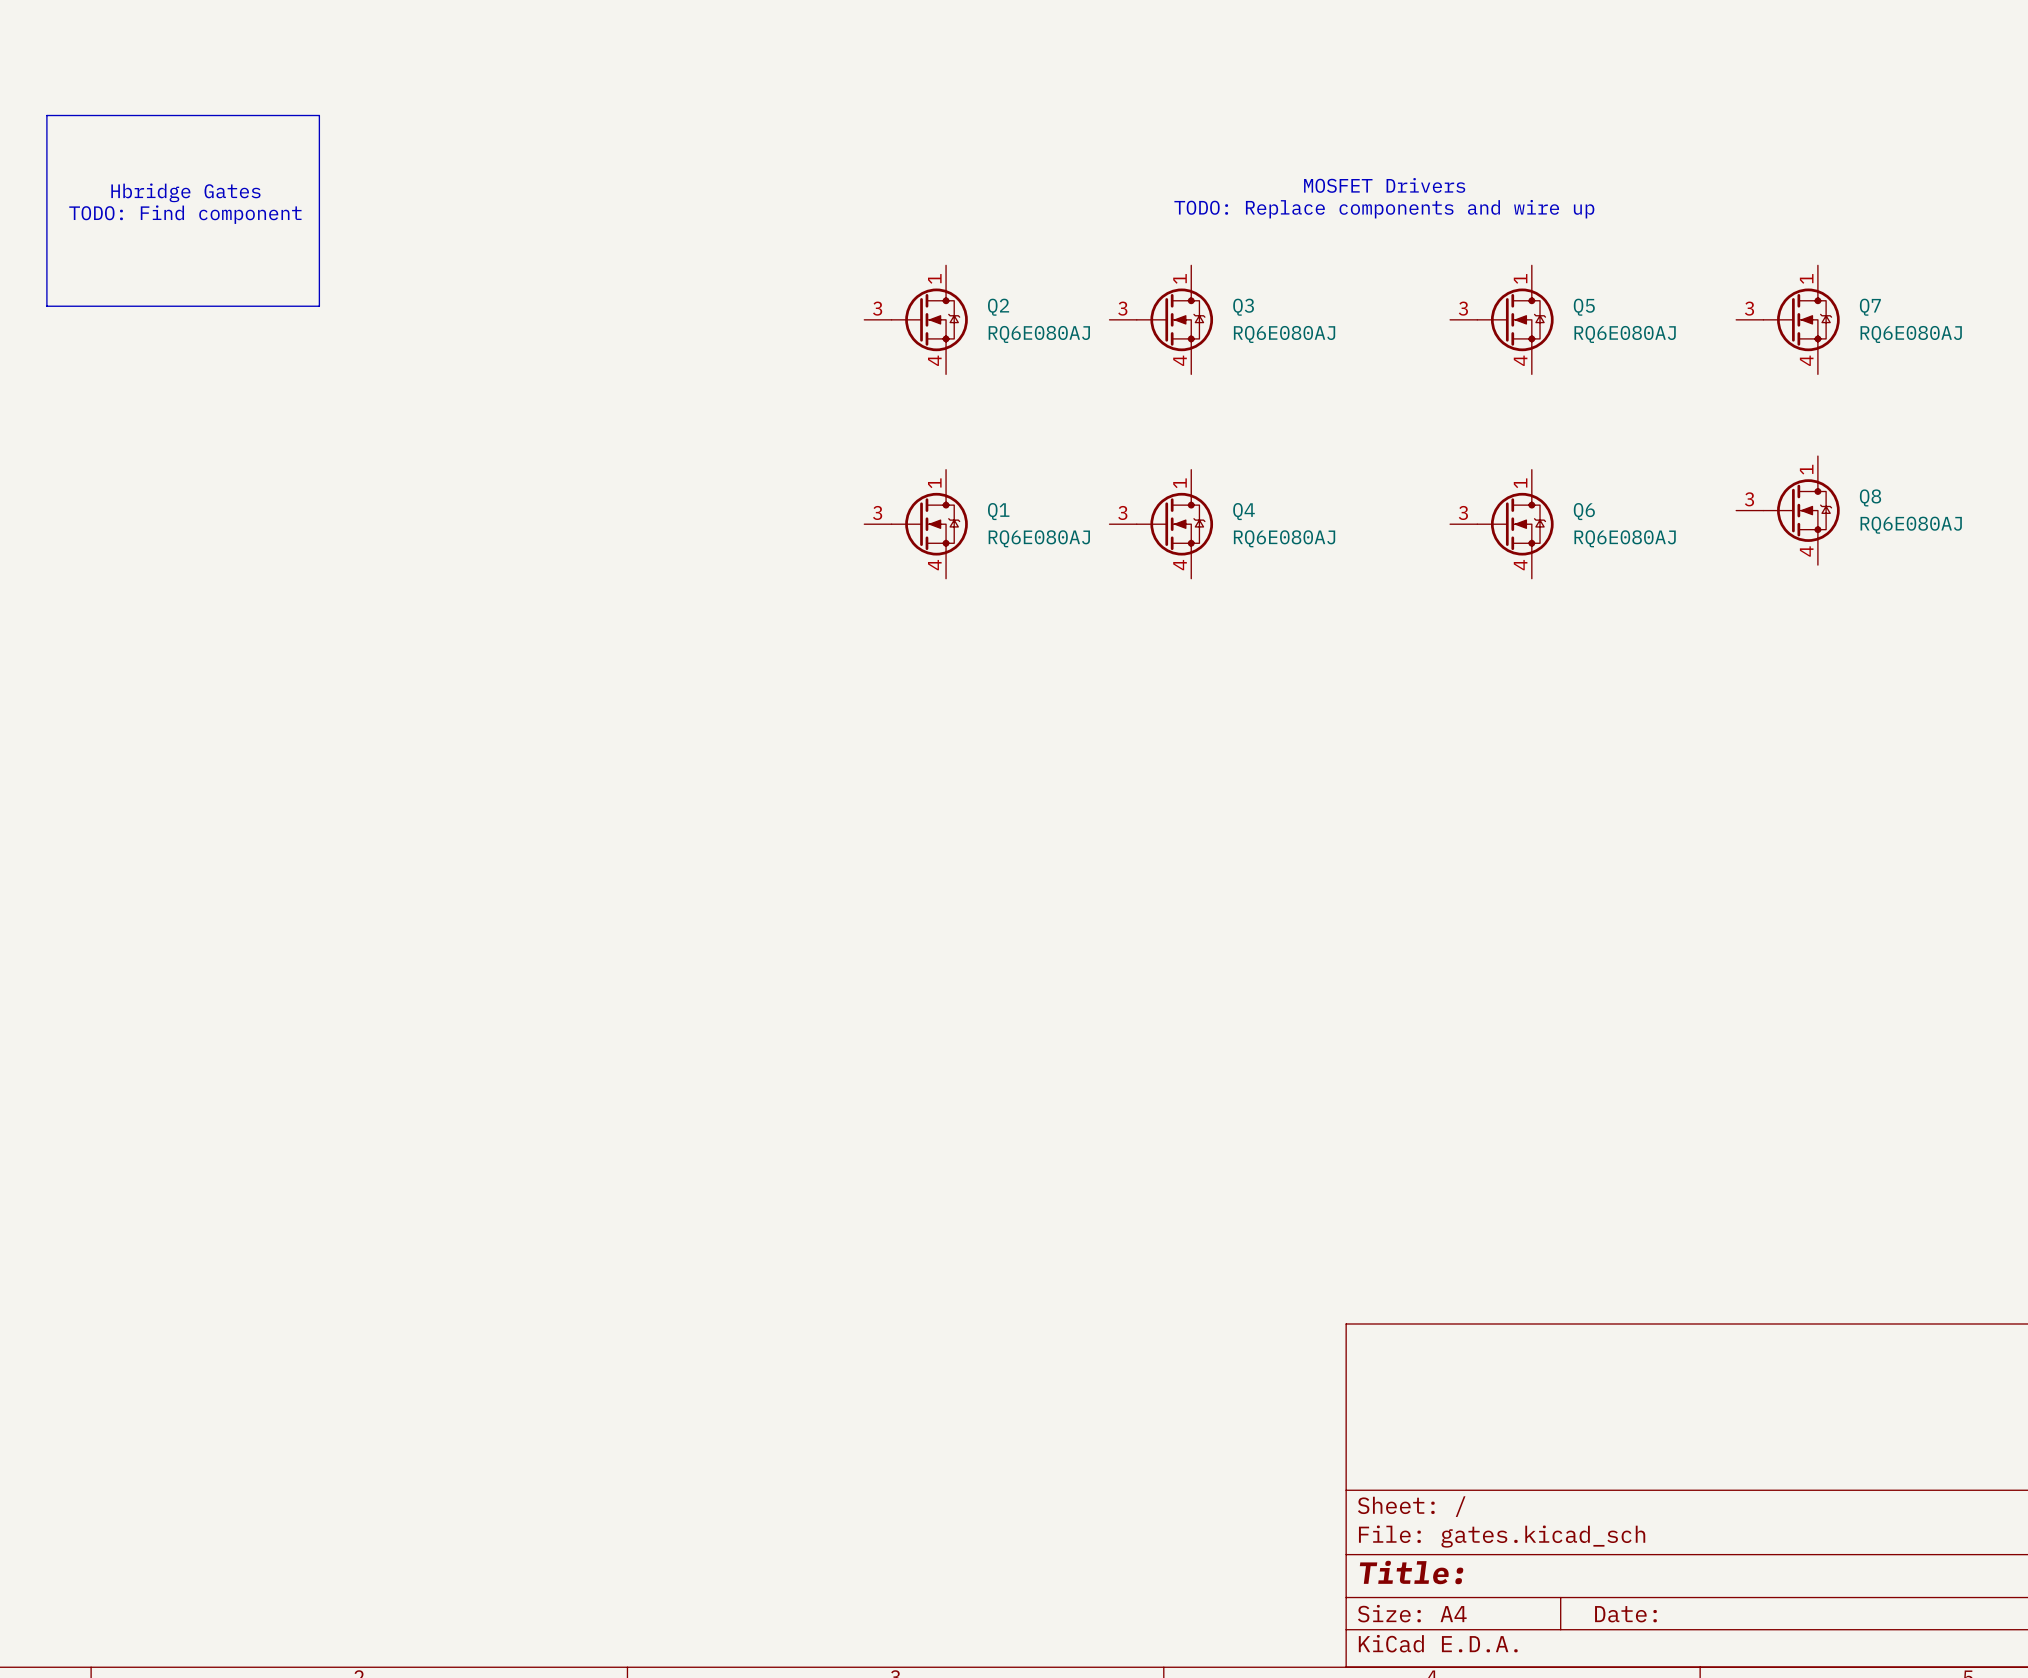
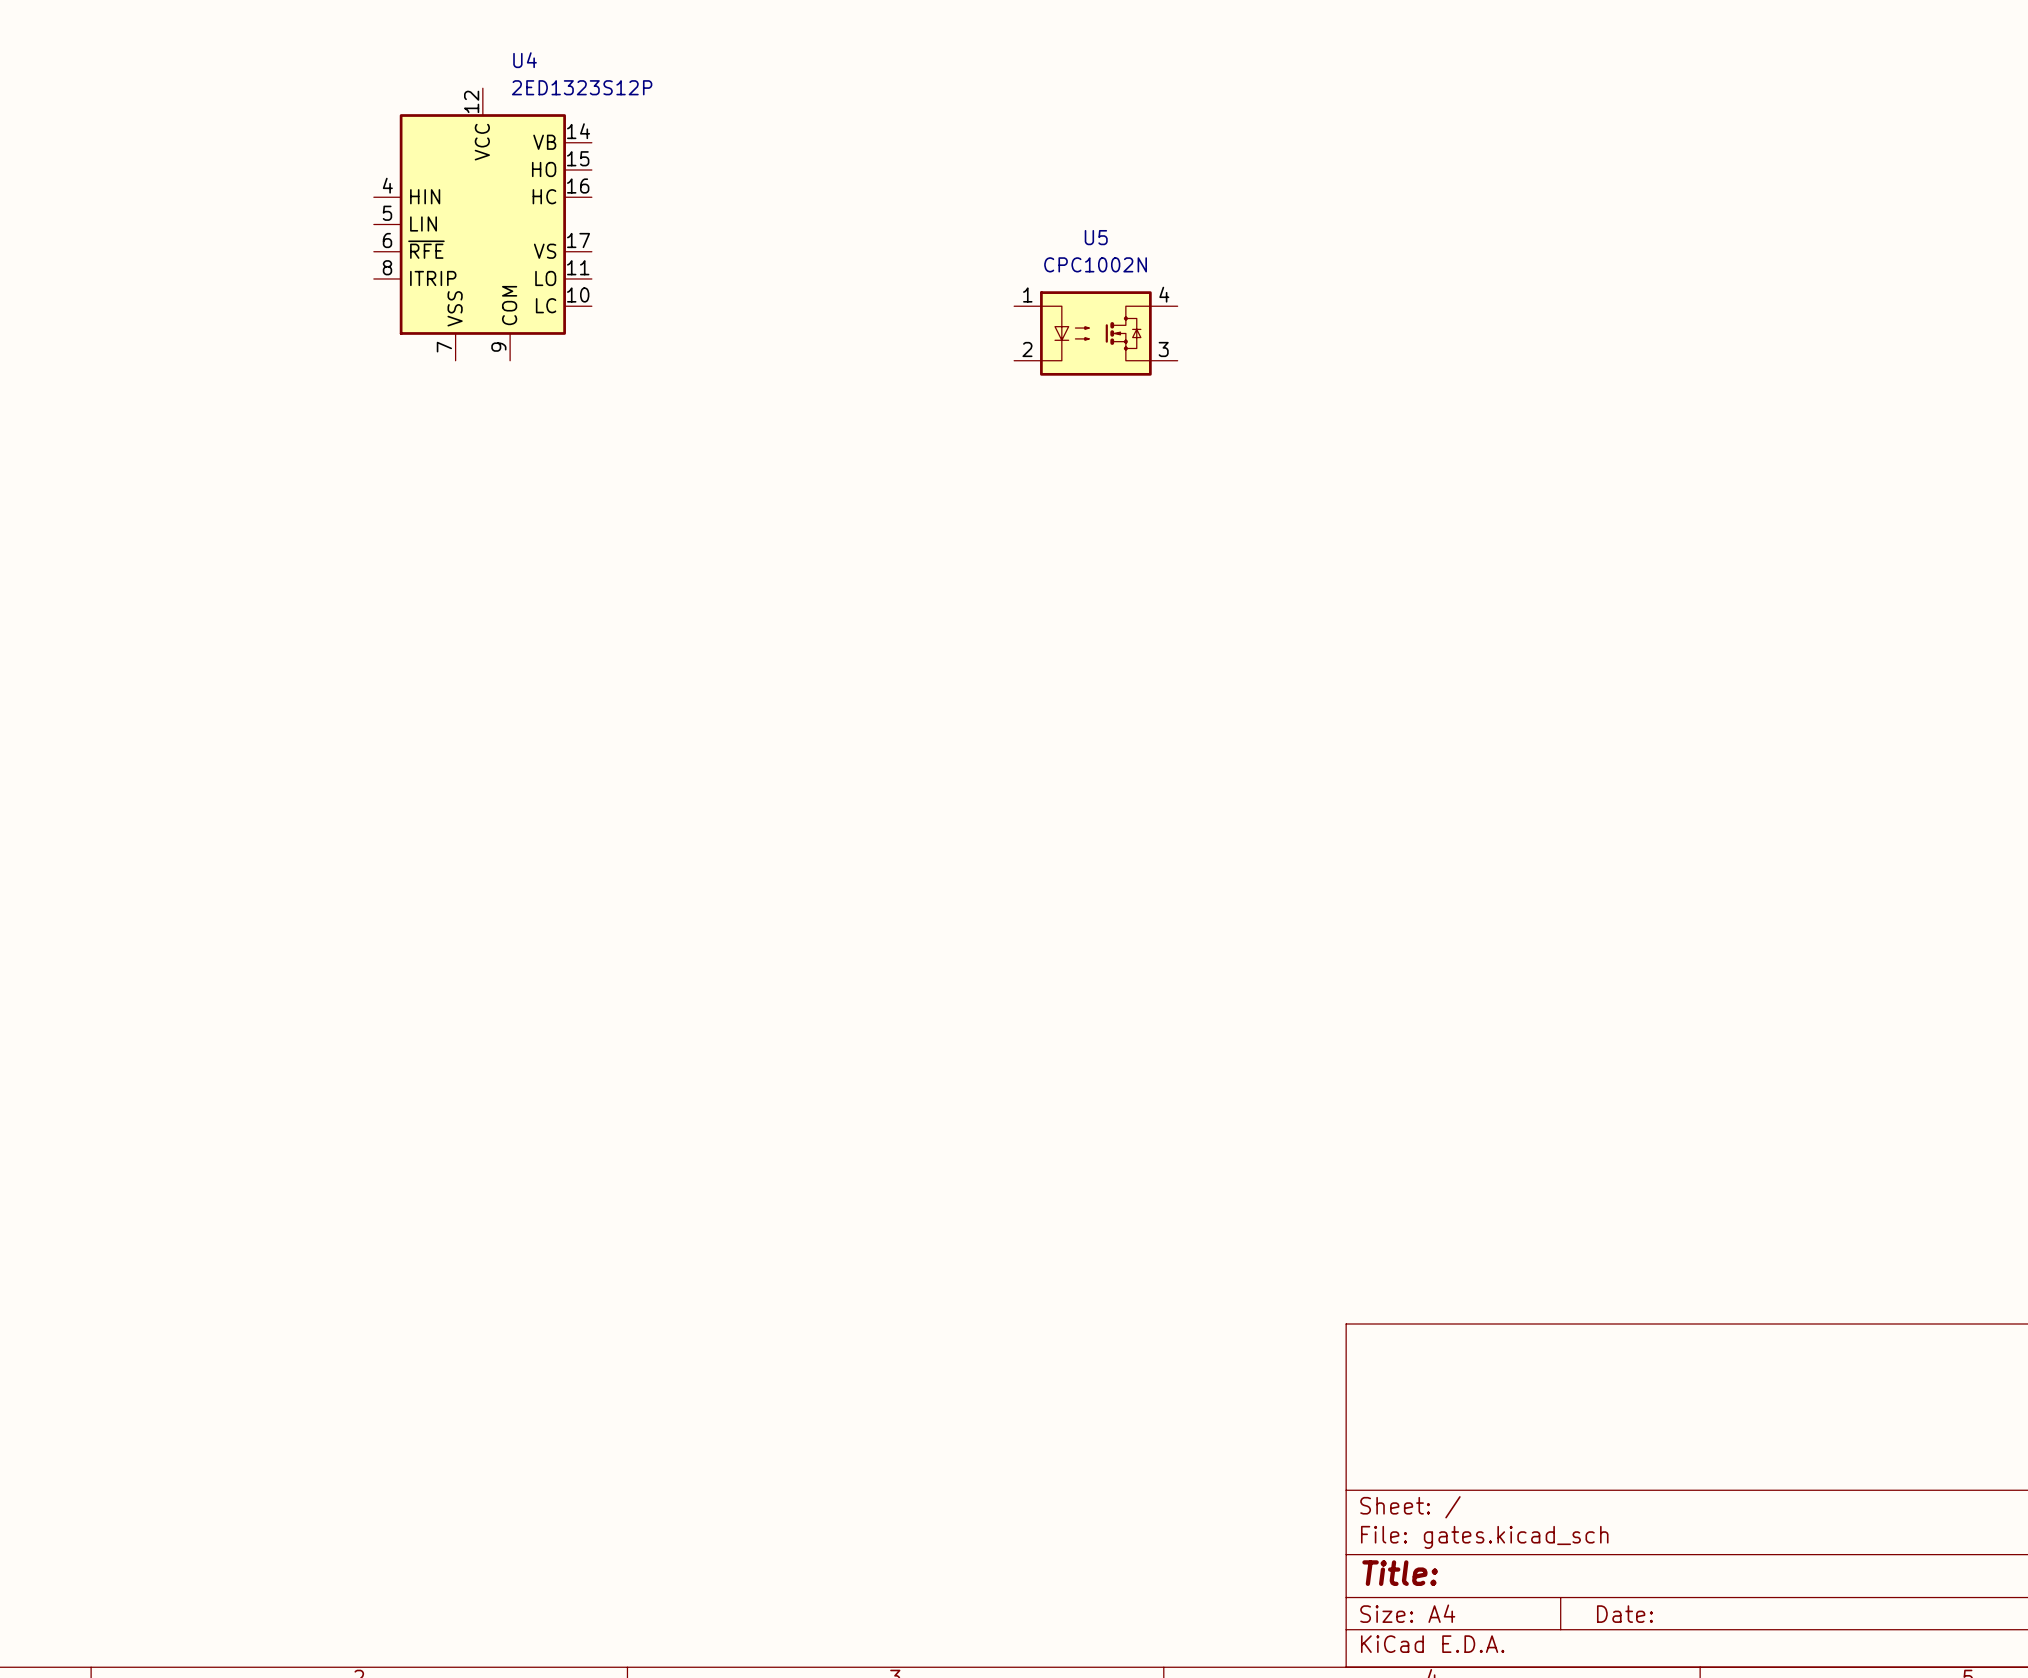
line: (46, 115) (319, 115) (319, 306) (46, 306) (46, 115) -> none
text: MOSFET Drivers (1384, 185) -> none
text: Hbridge Gates (185, 192) -> none
text: TODO: Replace components and wire up (1384, 209) -> none
text: TODO: Find component (185, 214) -> none
U4: none -> 2ED1323S12P (482, 224)
Q2: RQ6E080AJ (916, 319) -> none
Q3: RQ6E080AJ (1161, 319) -> none
Q5: RQ6E080AJ (1501, 319) -> none
Q7: RQ6E080AJ (1787, 319) -> none
U5: none -> CPC1002N (1095, 333)
Q8: RQ6E080AJ (1787, 510) -> none
Q1: RQ6E080AJ (916, 524) -> none
Q4: RQ6E080AJ (1161, 524) -> none
Q6: RQ6E080AJ (1501, 524) -> none

